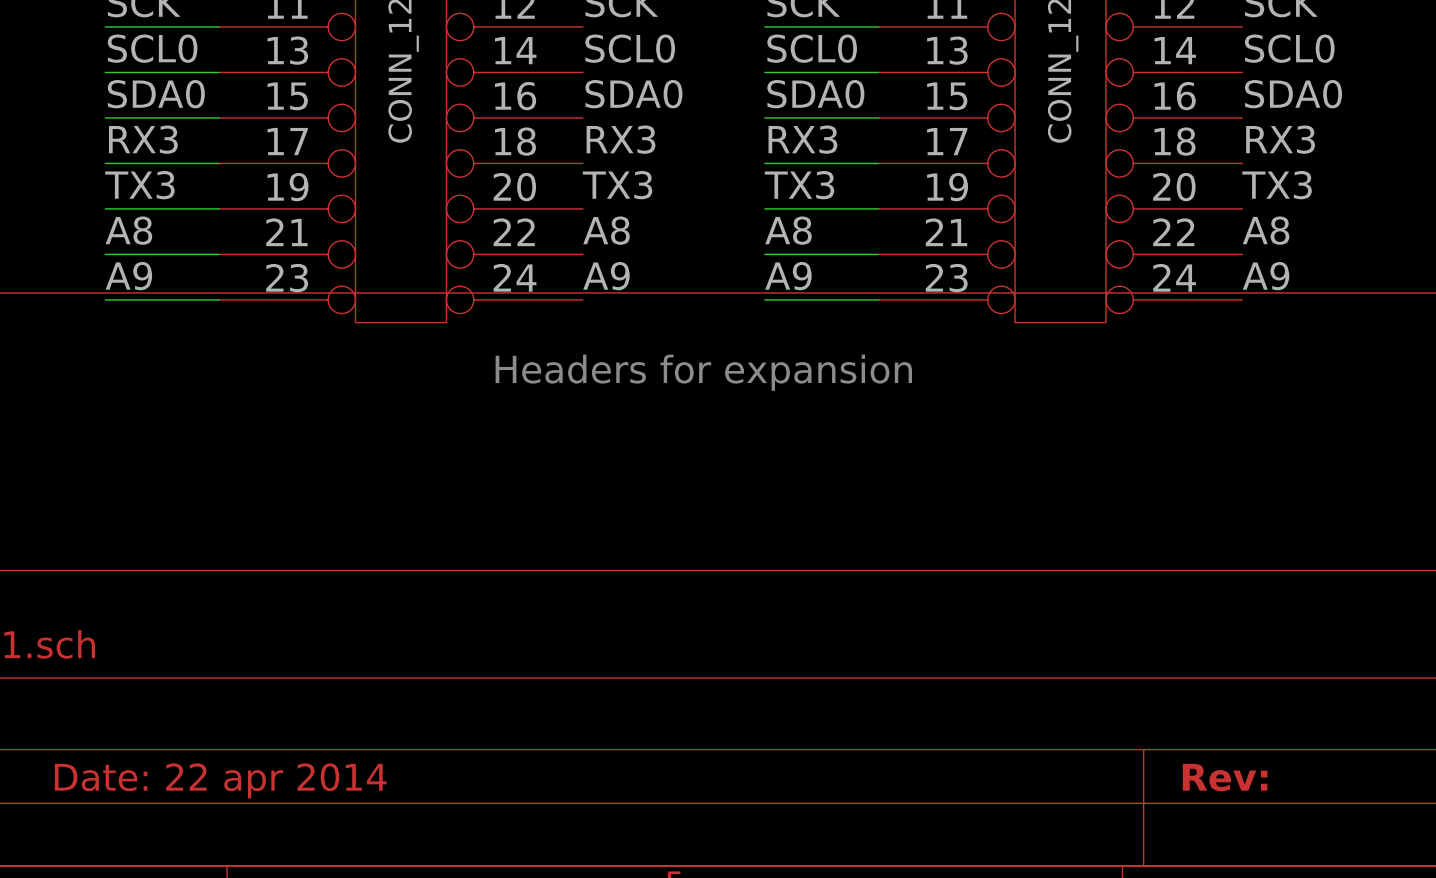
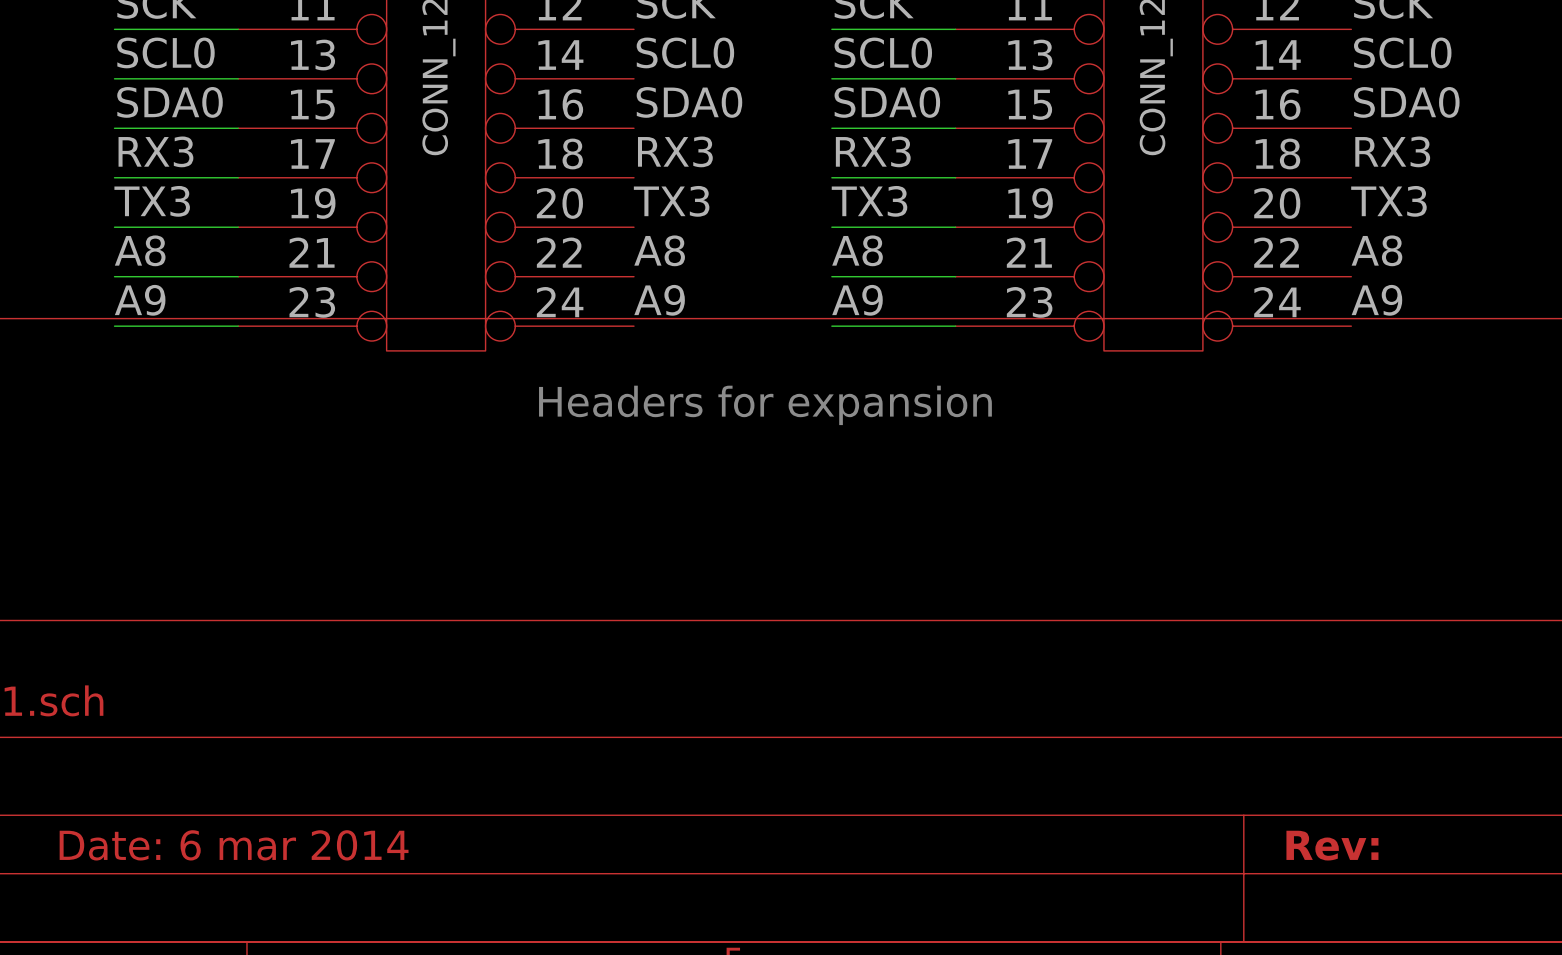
title block: Date: 22 apr 2014 (220, 780) -> Date: 6 mar 2014 (234, 845)

